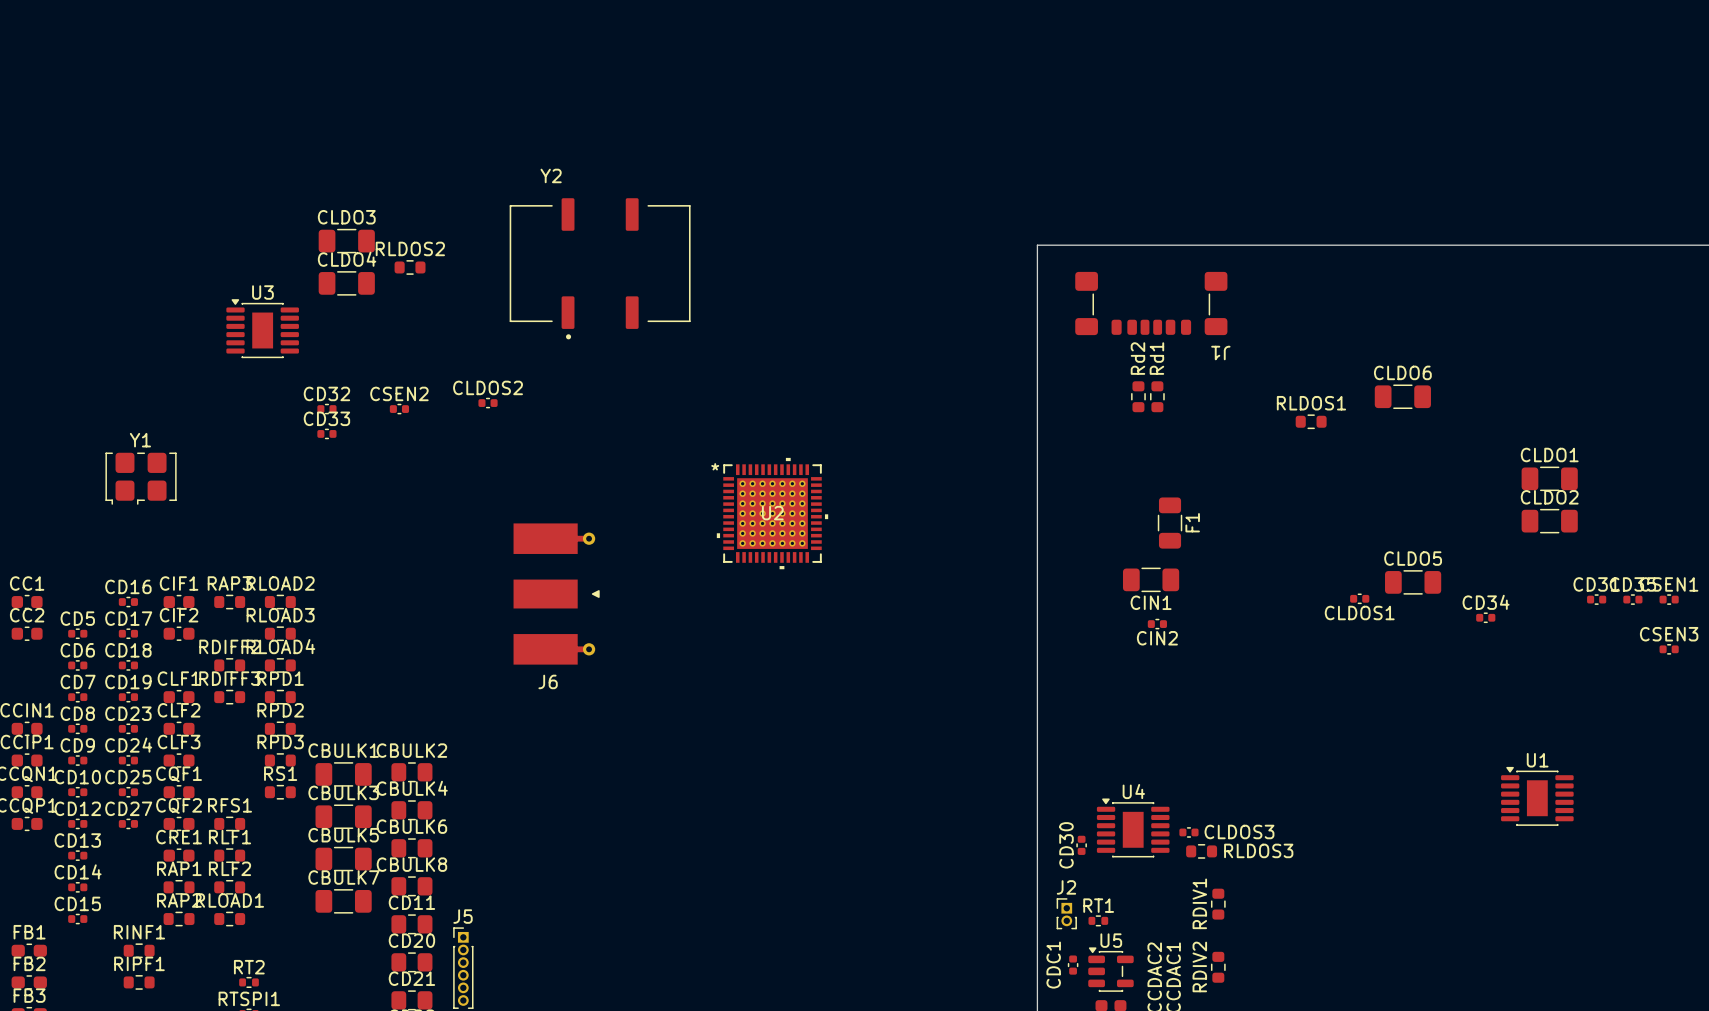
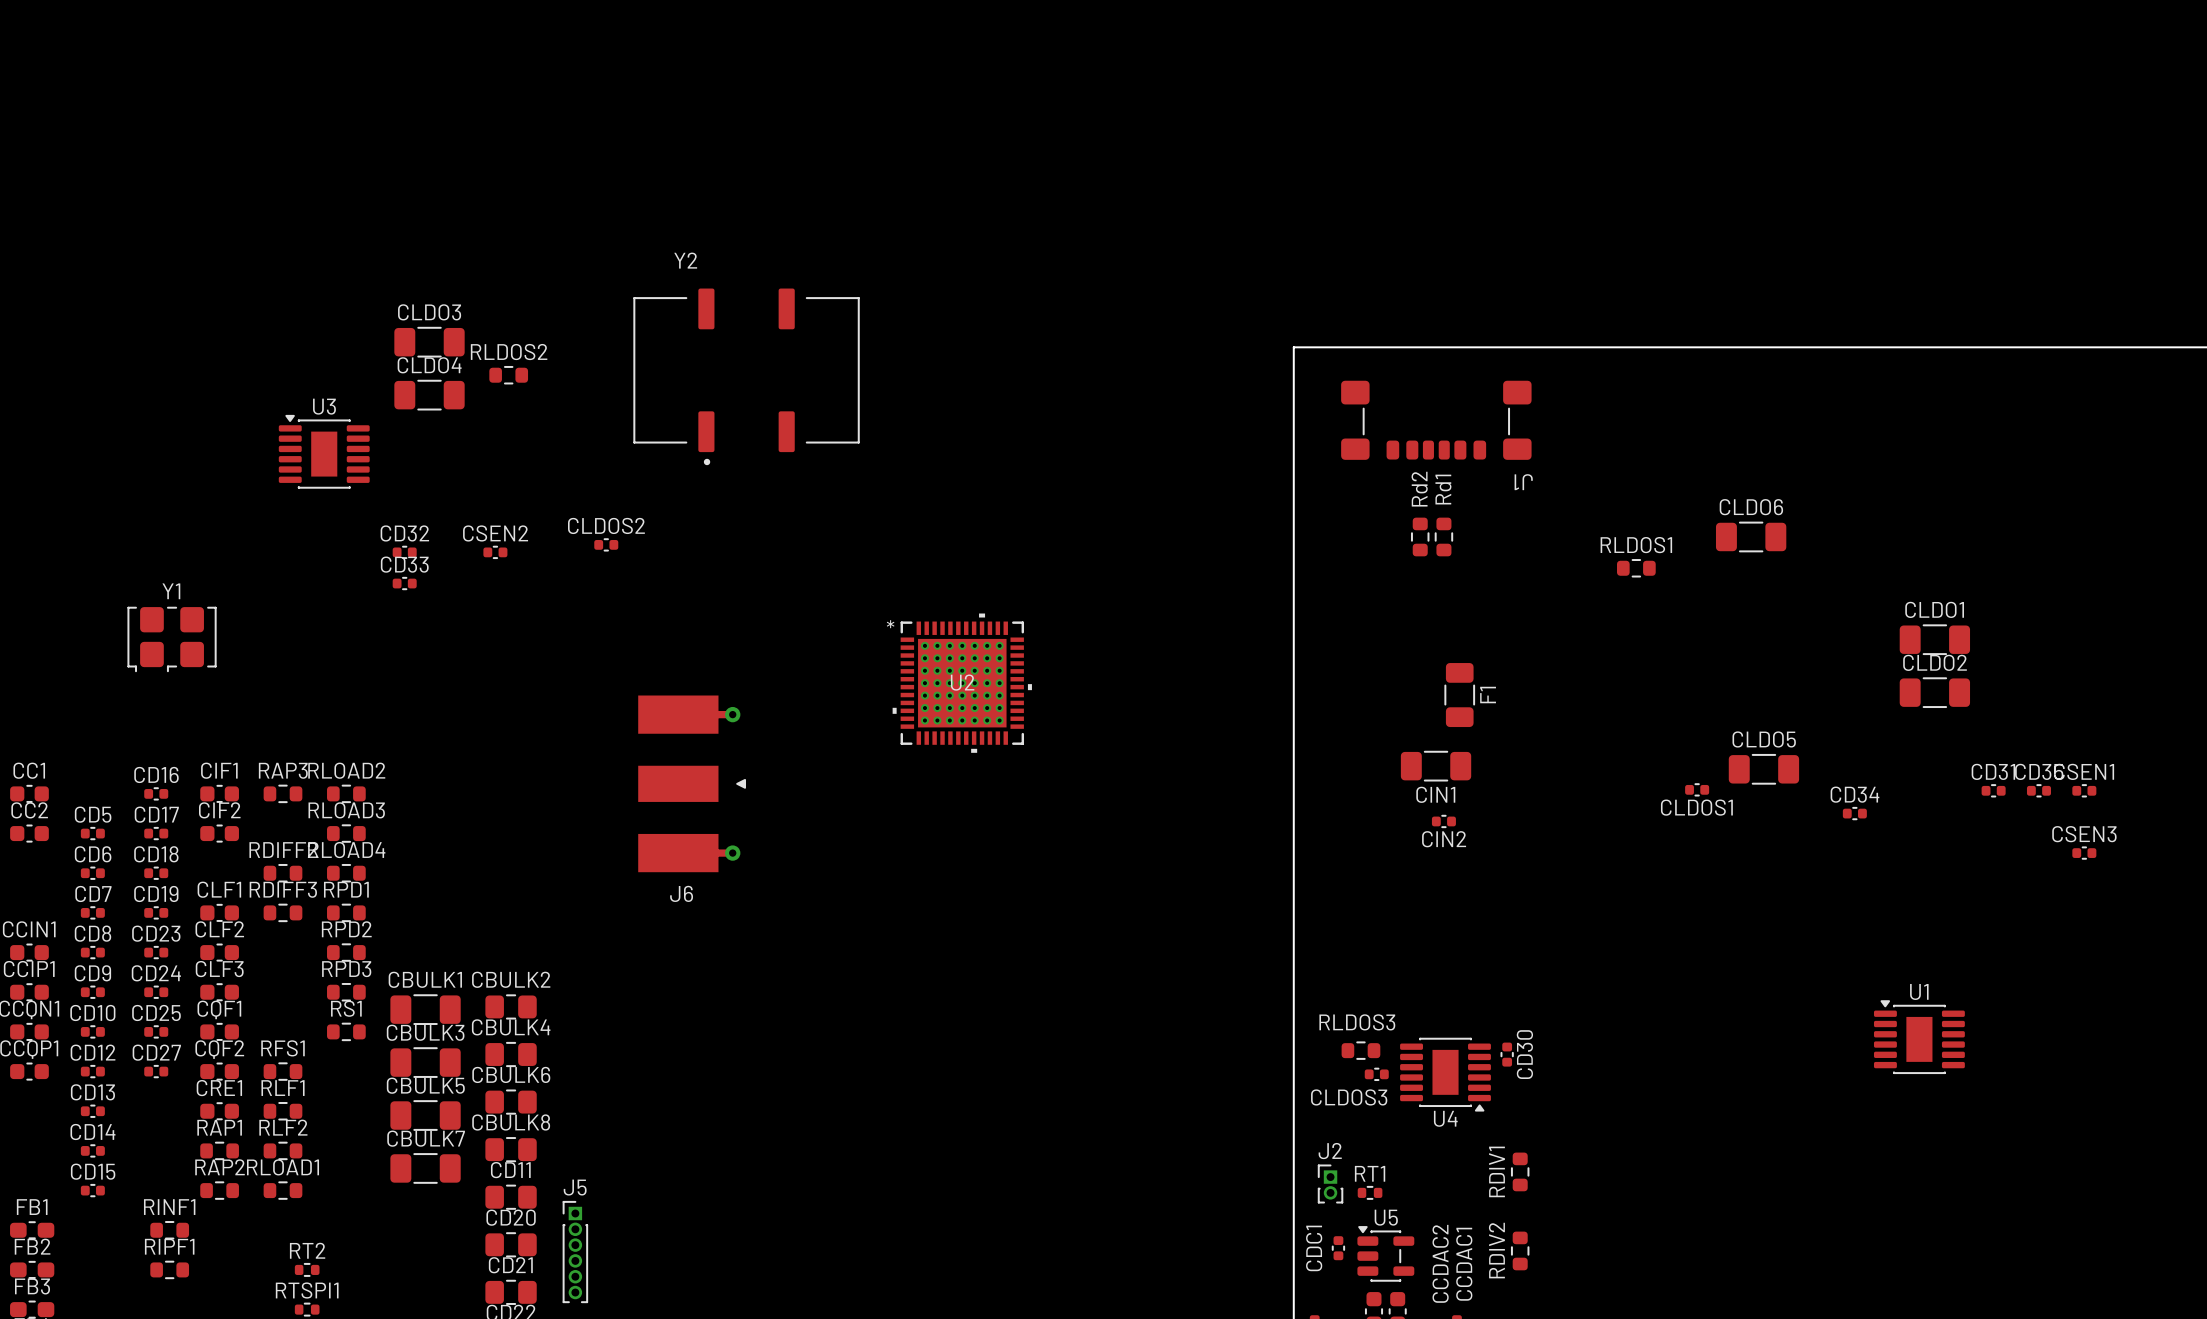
U4 rotation: 0° (1133, 827) -> 180° (1445, 1074)
CLDOS3 name position: CLDOS3 (1239, 831) -> CLDOS3 (1349, 1097)
CLDOS3 position: (1188, 832) -> (1376, 1074)
CD30 name position: CD30 (1066, 845) -> CD30 (1524, 1054)
CD30 position: (1081, 845) -> (1507, 1054)
RLDOS3 name position: RLDOS3 (1258, 850) -> RLDOS3 (1357, 1022)
RLDOS3 position: (1201, 851) -> (1360, 1050)

